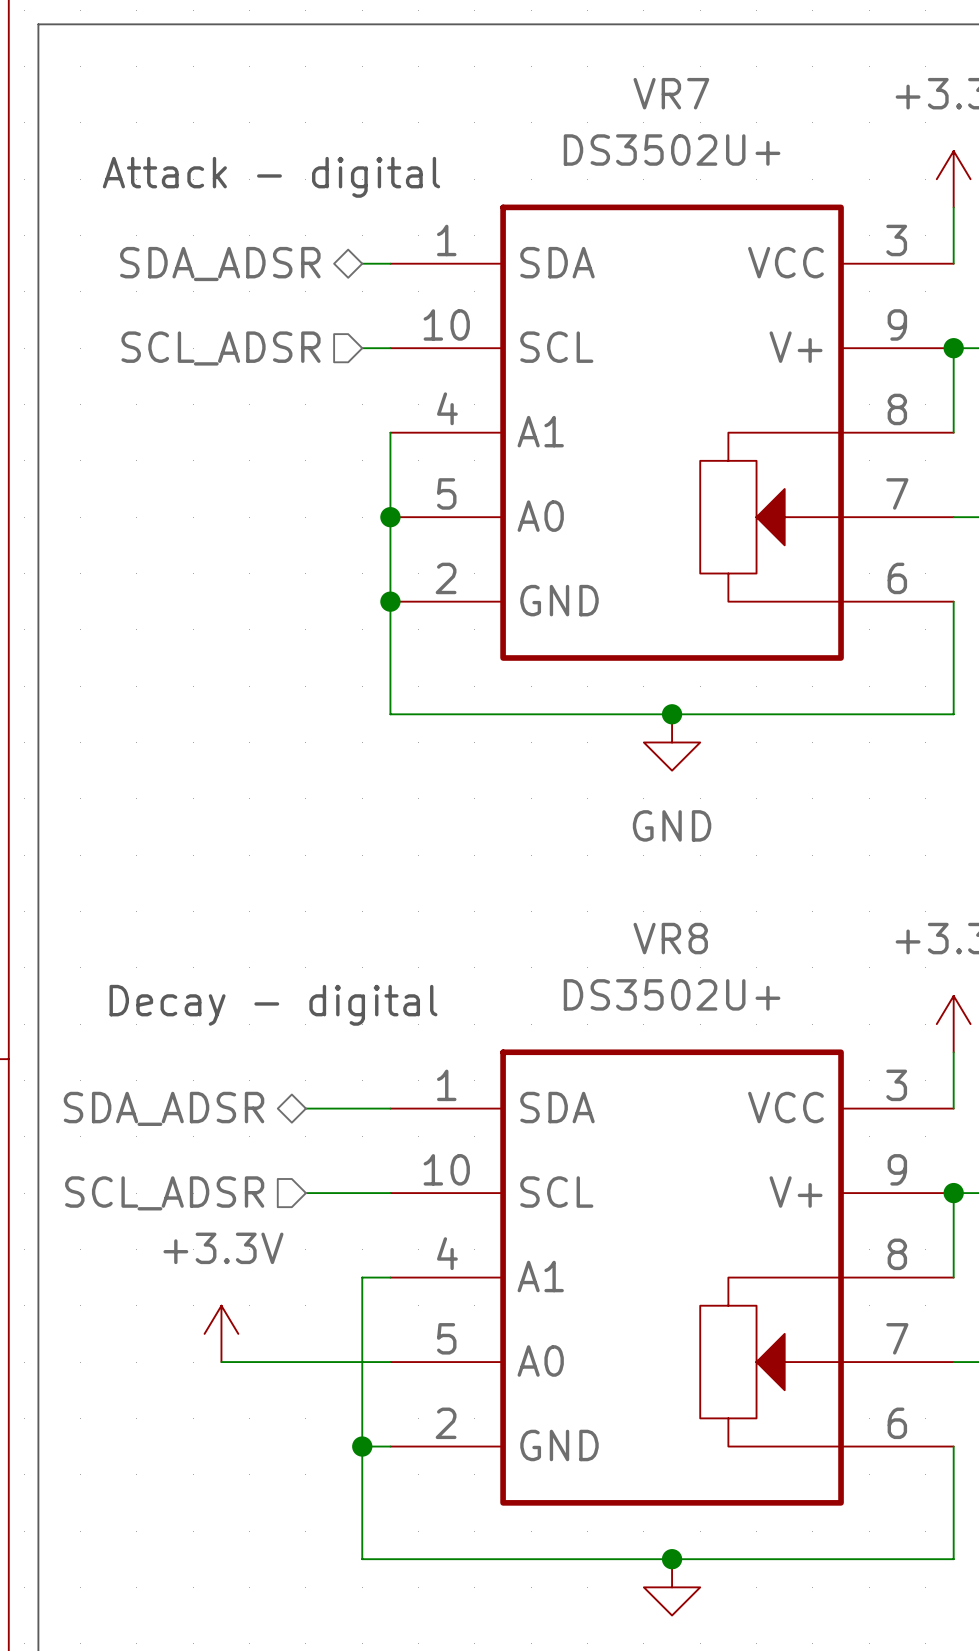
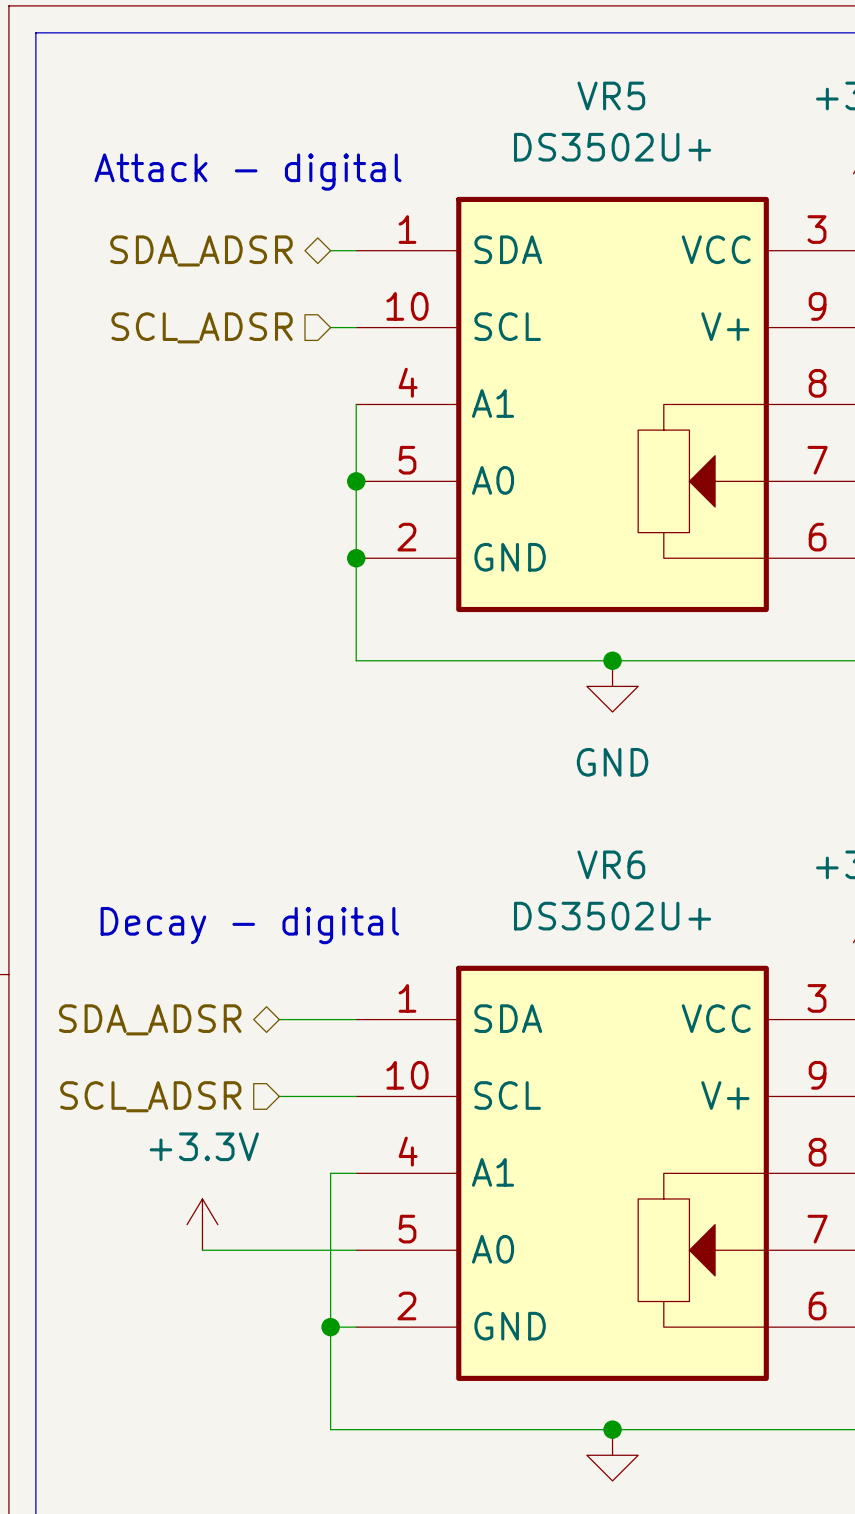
VR7 name: VR7 (671, 93) -> VR5 (611, 95)
VR8 name: VR8 (670, 938) -> VR6 (611, 864)

